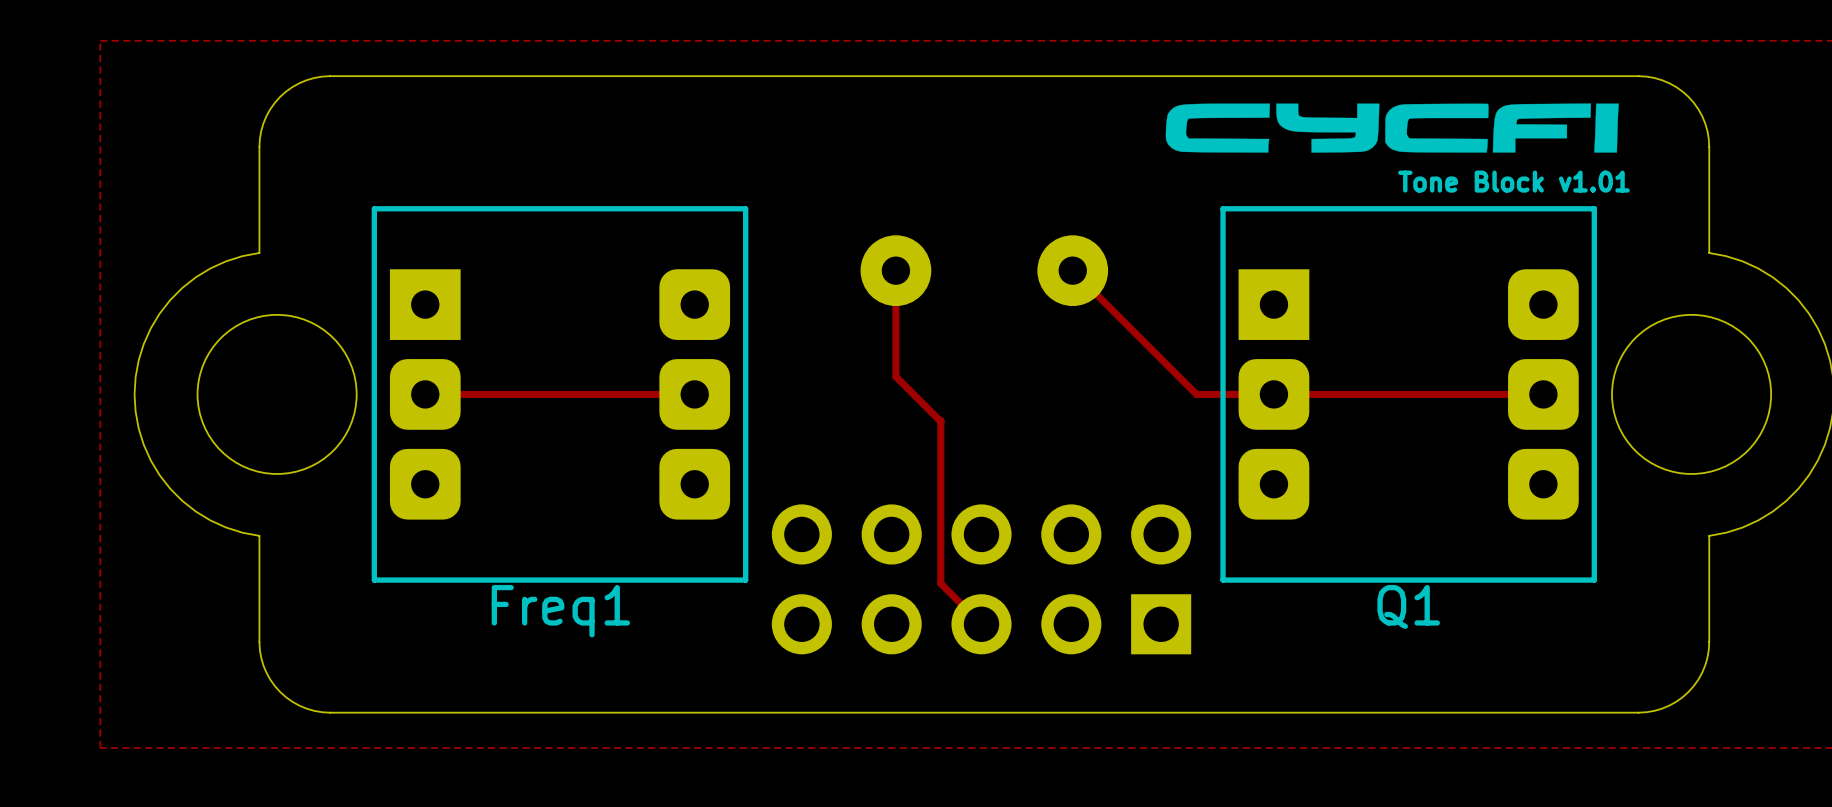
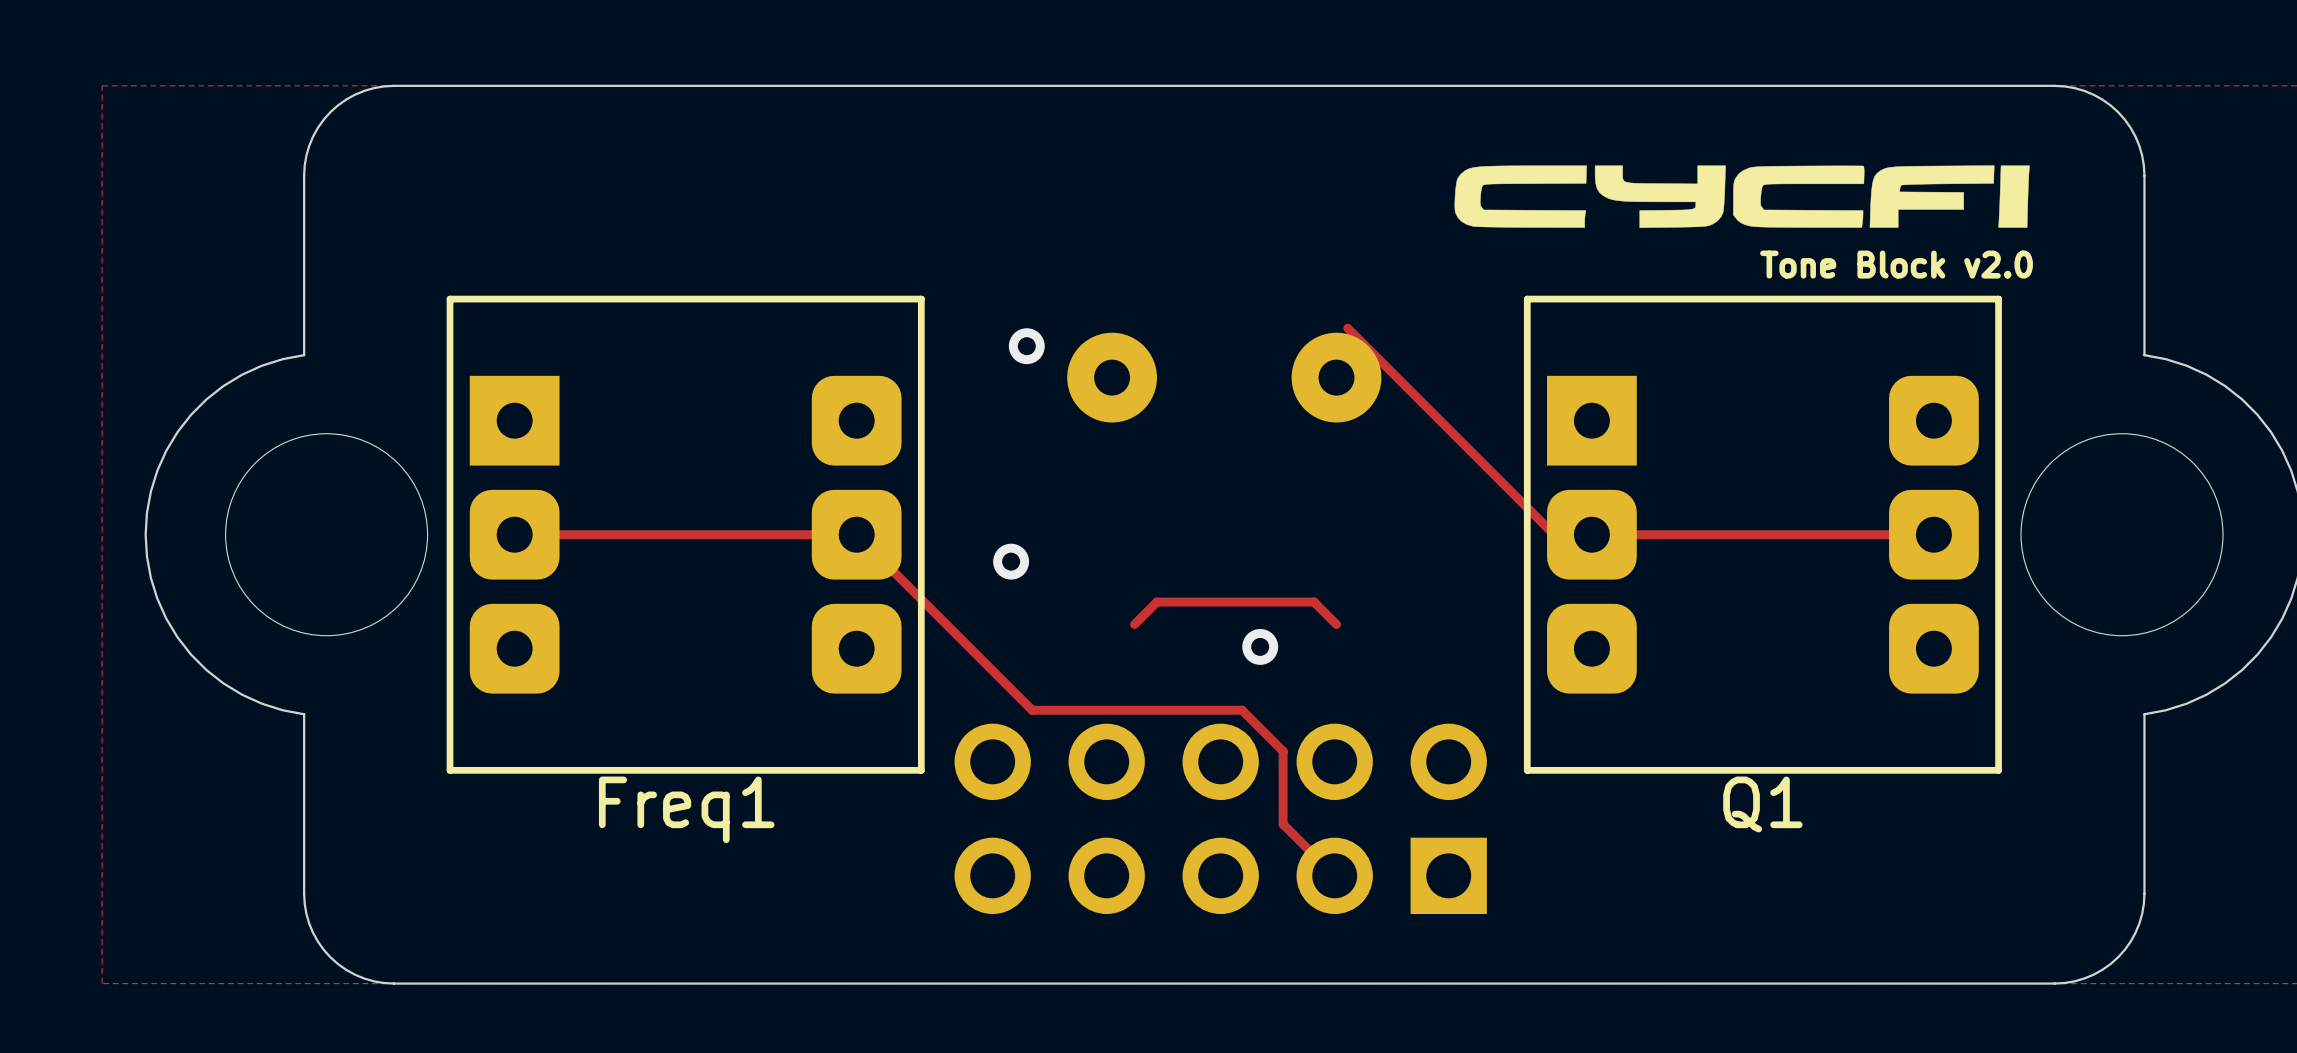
board edge: (259, 146) (261, 131) (266, 116) (280, 96) (292, 87) (306, 80) (330, 76) (1638, 76) (1654, 77) (1669, 83) (1688, 96) (1698, 109) (1705, 123) (1709, 146) -> (304, 220) (304, 165) (309, 145) (317, 127) (330, 112) (346, 99) (364, 90) (393, 85) (2064, 86) (2084, 90) (2102, 99) (2118, 112) (2130, 127) (2139, 145) (2143, 165) (2144, 220)
text: Tone Block v1.01 (1513, 181) -> Tone Block v2.0 (1896, 264)
via: none -> (1026, 346)
track: (895, 270) (895, 376) (940, 421) -> none
track: (1072, 288) (1072, 270) (1196, 394) (1244, 394) -> (1347, 328) (1554, 534)
track: none -> (856, 534) (1032, 710) (1242, 710) (1283, 751) (1283, 824) (1334, 875)
via: none -> (1011, 561)
track: (940, 420) (940, 583) (981, 624) -> none
track: none -> (1134, 624) (1156, 602) (1314, 602) (1336, 624)
via: none -> (1260, 646)
part position: (981, 579) -> (1220, 818)
board edge: (259, 641) (261, 657) (266, 672) (280, 691) (292, 701) (306, 708) (330, 712) (1638, 712) (1661, 708) (1676, 701) (1688, 691) (1702, 672) (1707, 657) (1709, 641) -> (304, 848) (304, 903) (309, 923) (317, 941) (330, 957) (346, 969) (364, 978) (393, 983) (2064, 983) (2084, 978) (2102, 969) (2118, 957) (2130, 941) (2139, 923) (2143, 903) (2144, 848)

